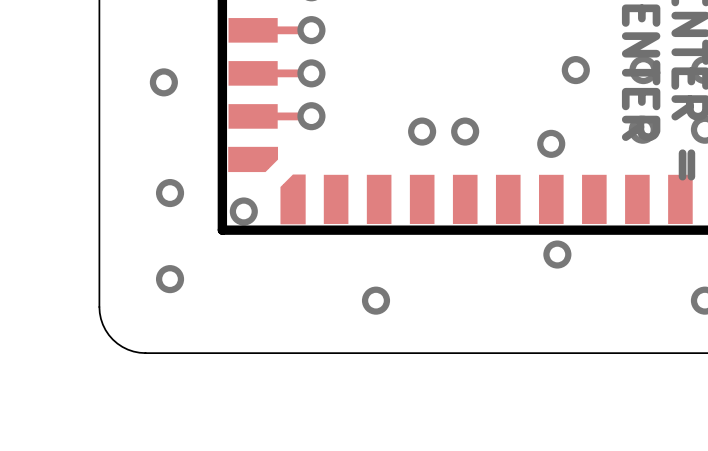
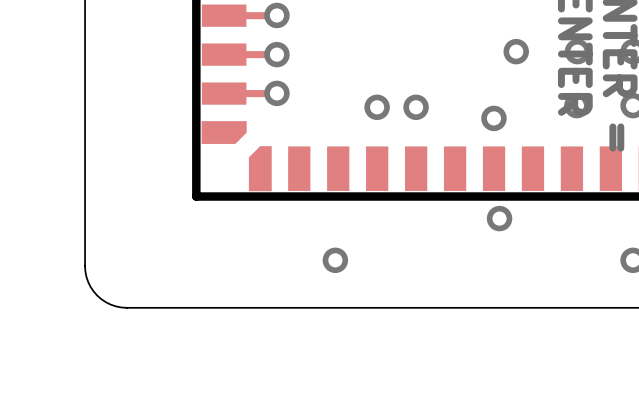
via: (163, 82) -> none
via: (170, 193) -> none
via: (243, 211) -> none
via: (170, 279) -> none

